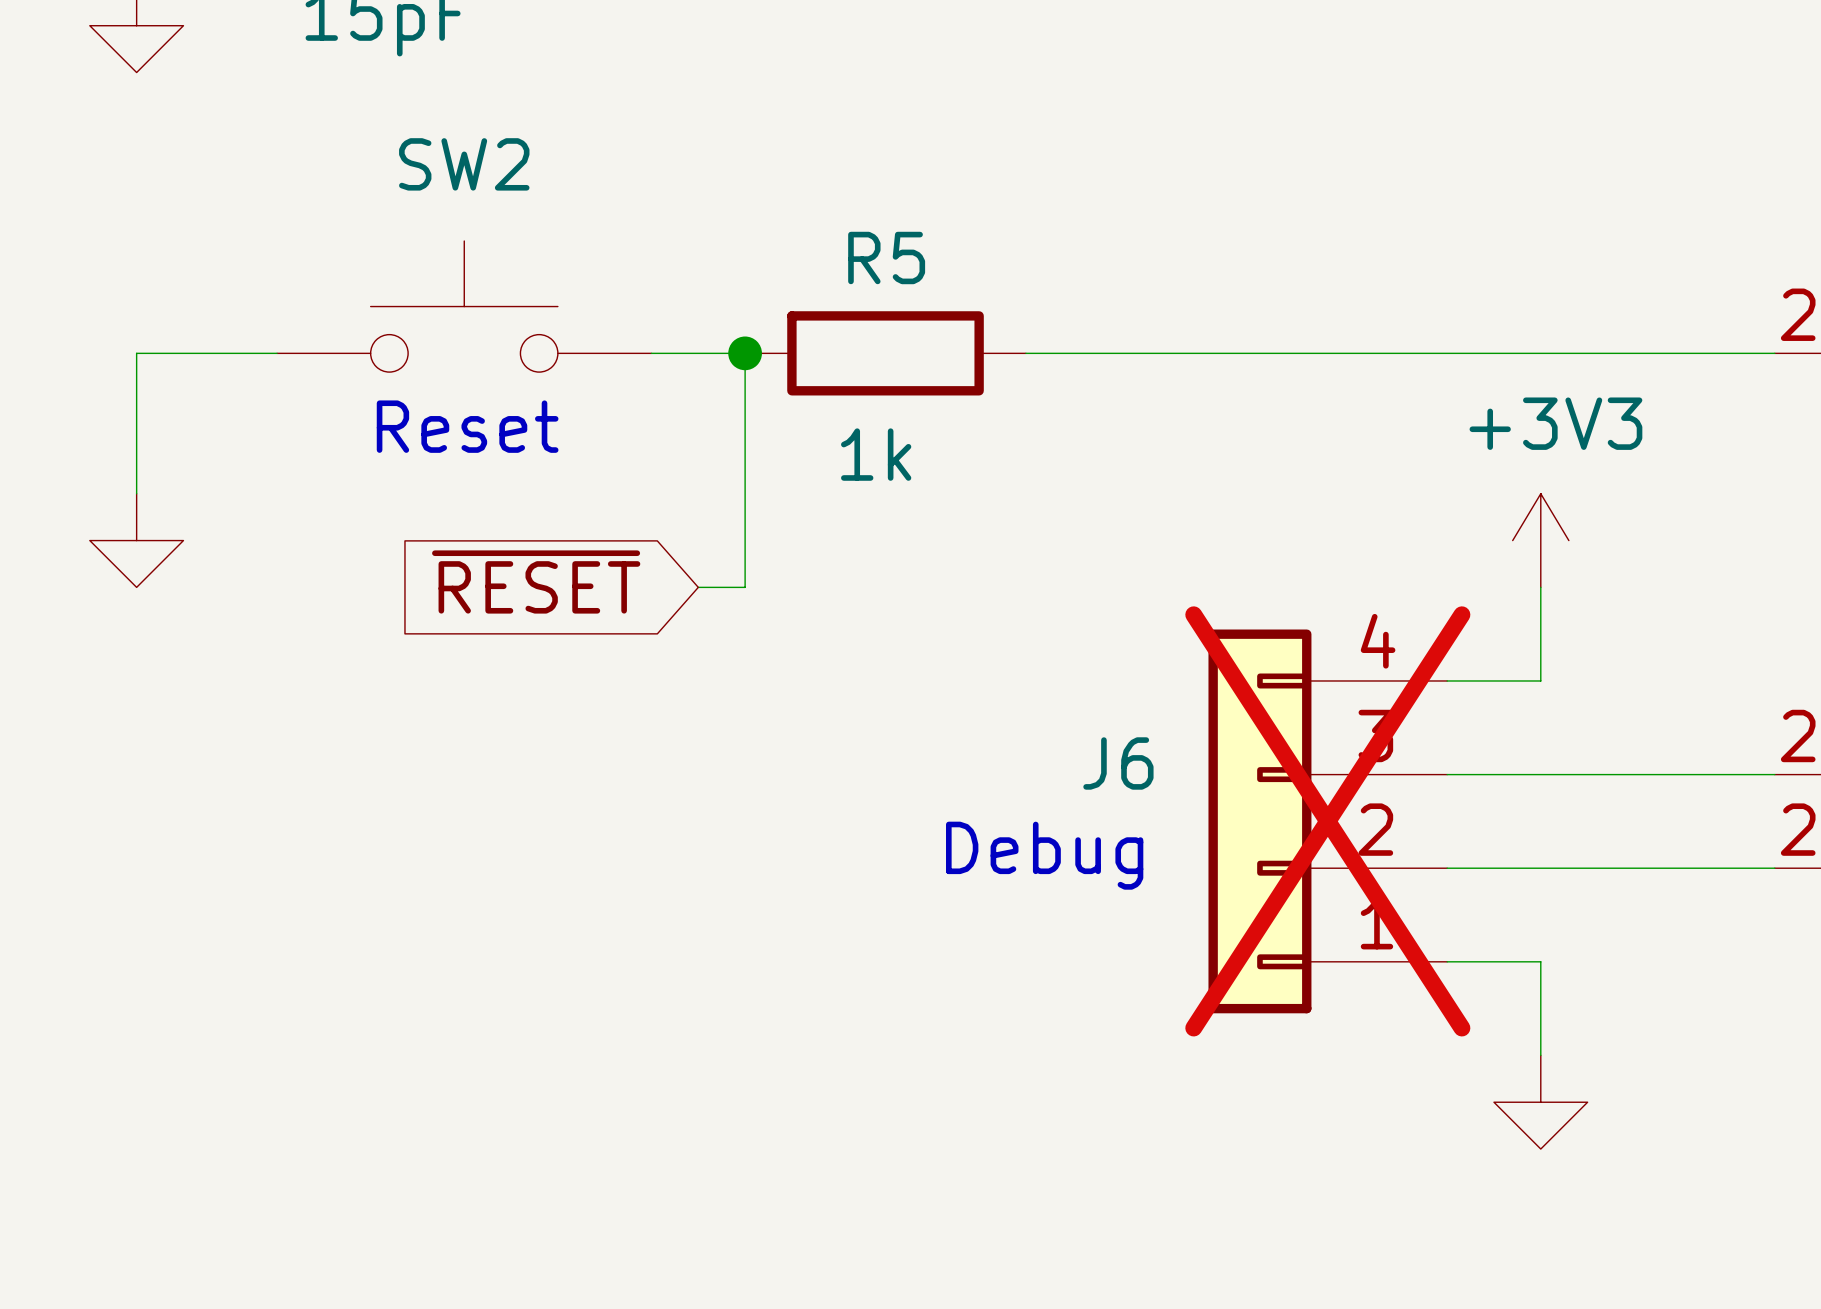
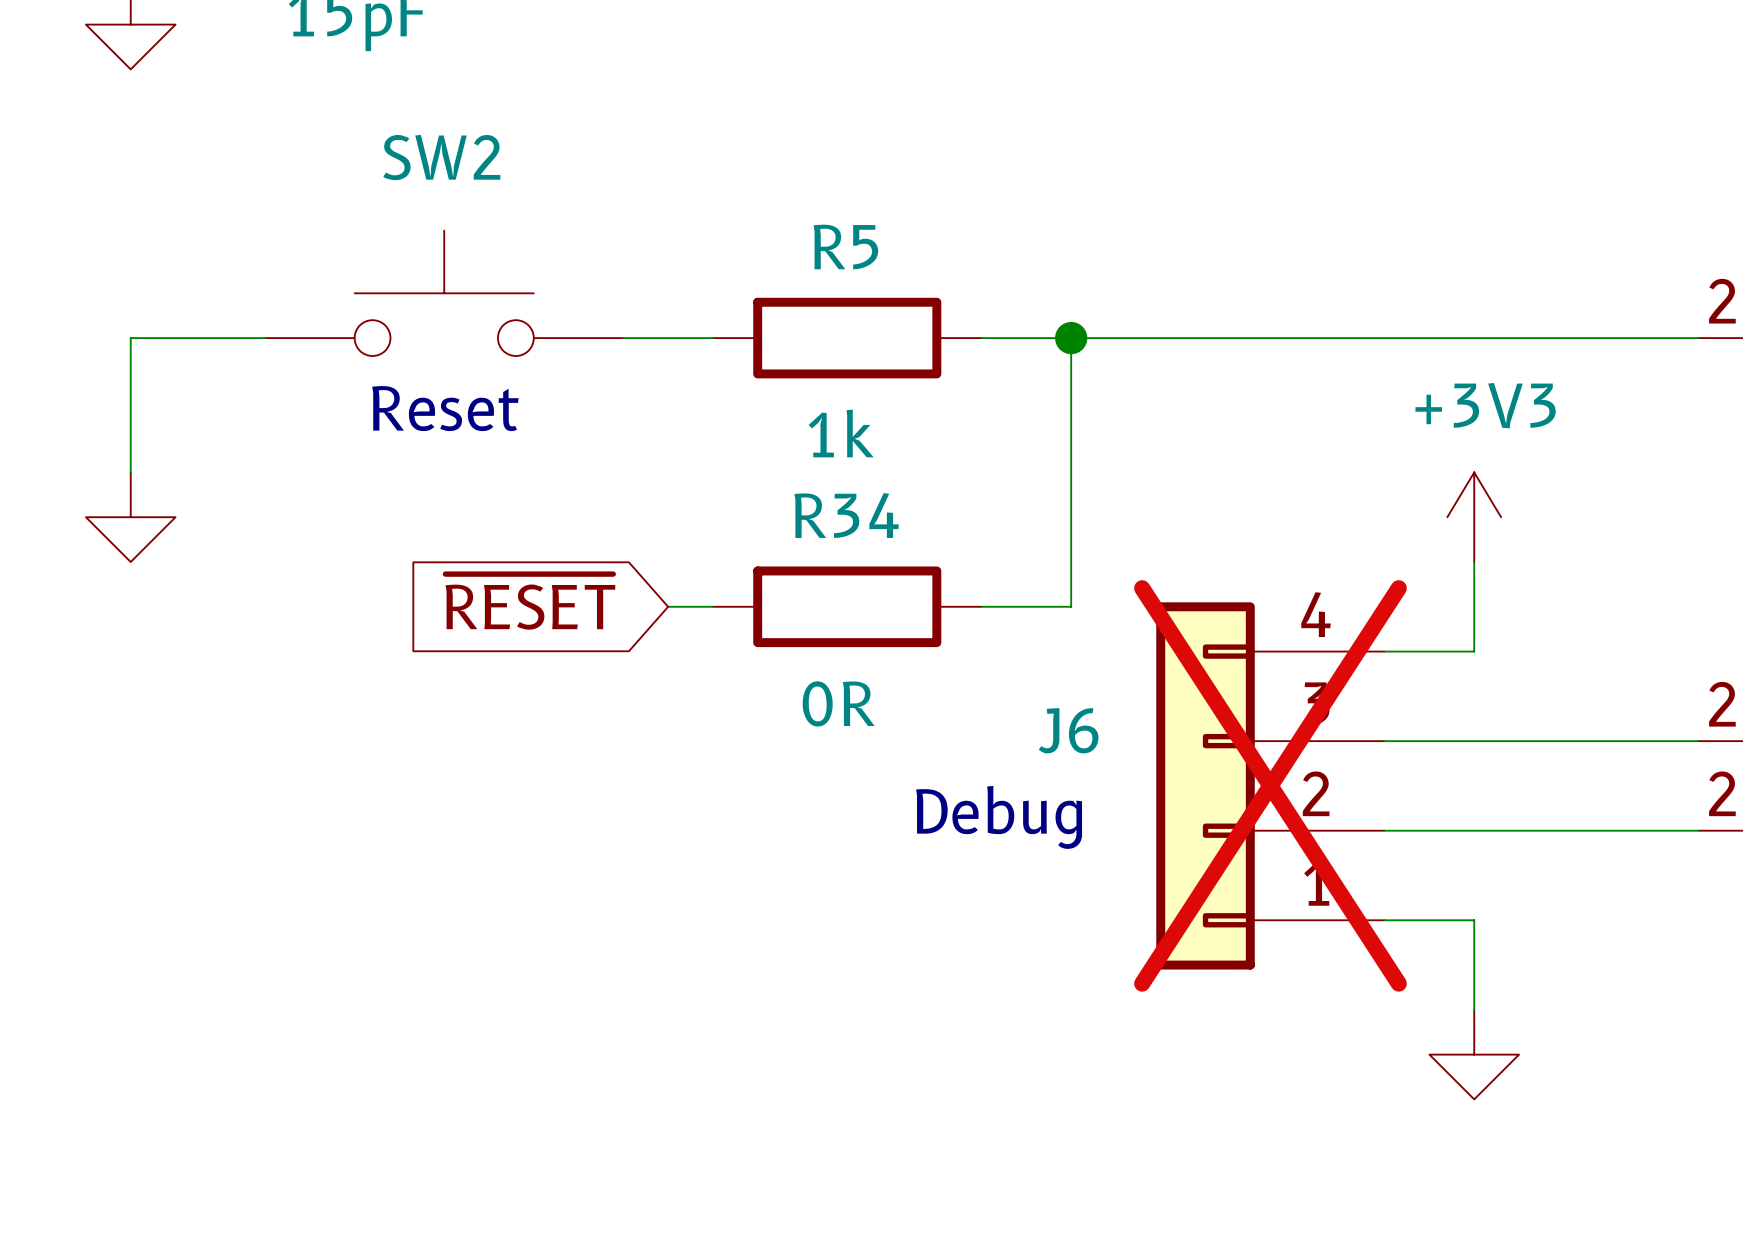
wire: (745, 353) (745, 587) (698, 587) -> none
junction: (745, 353) -> none
wire: none -> (1071, 338) (1071, 606) (981, 606)
junction: none -> (1071, 338)
global label position: ~{RESET} (536, 581) -> ~{RESET} (530, 601)
wire: none -> (668, 606) (712, 606)
R34: none -> 0R (847, 606)

